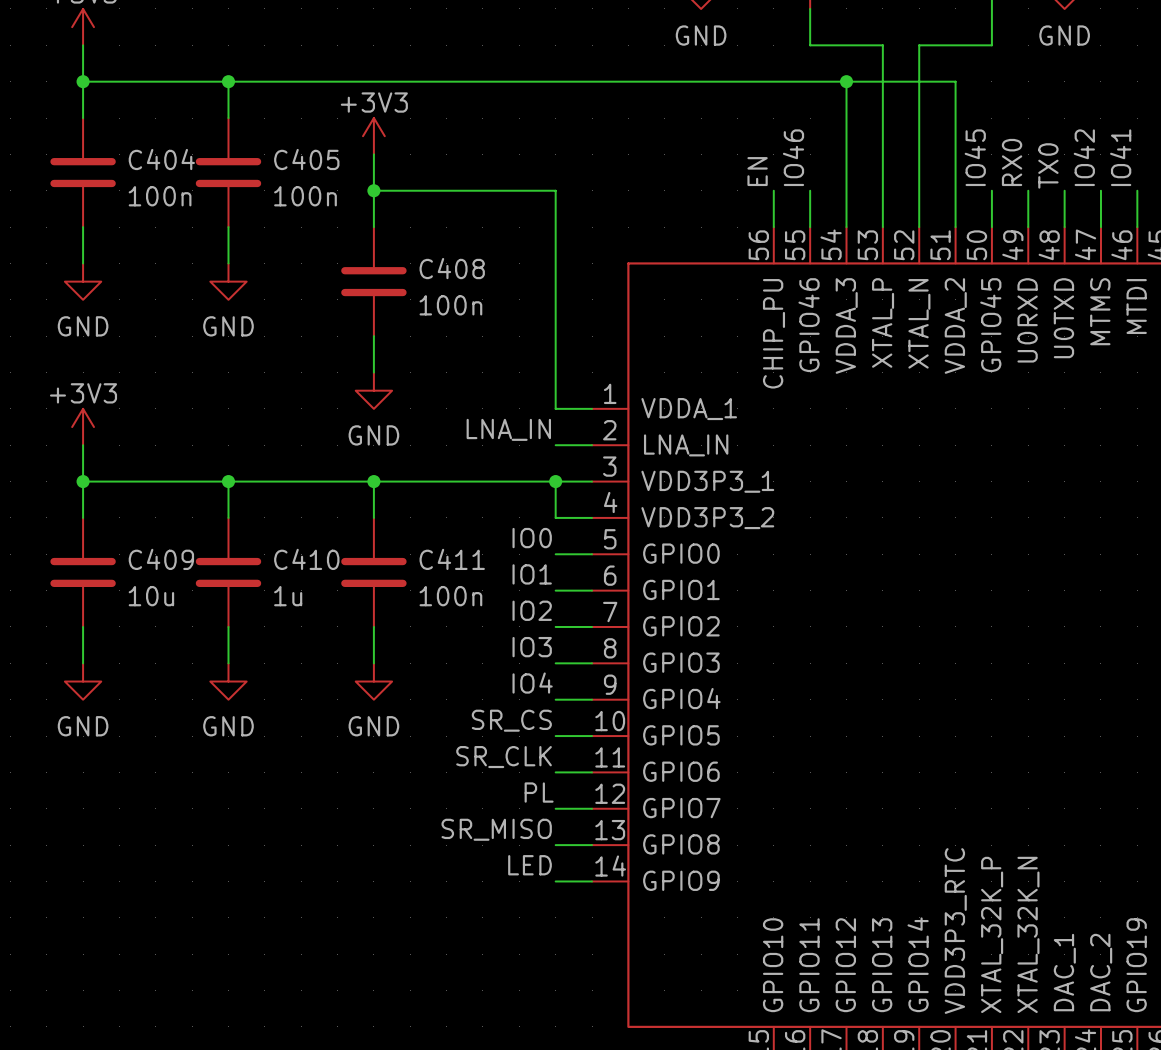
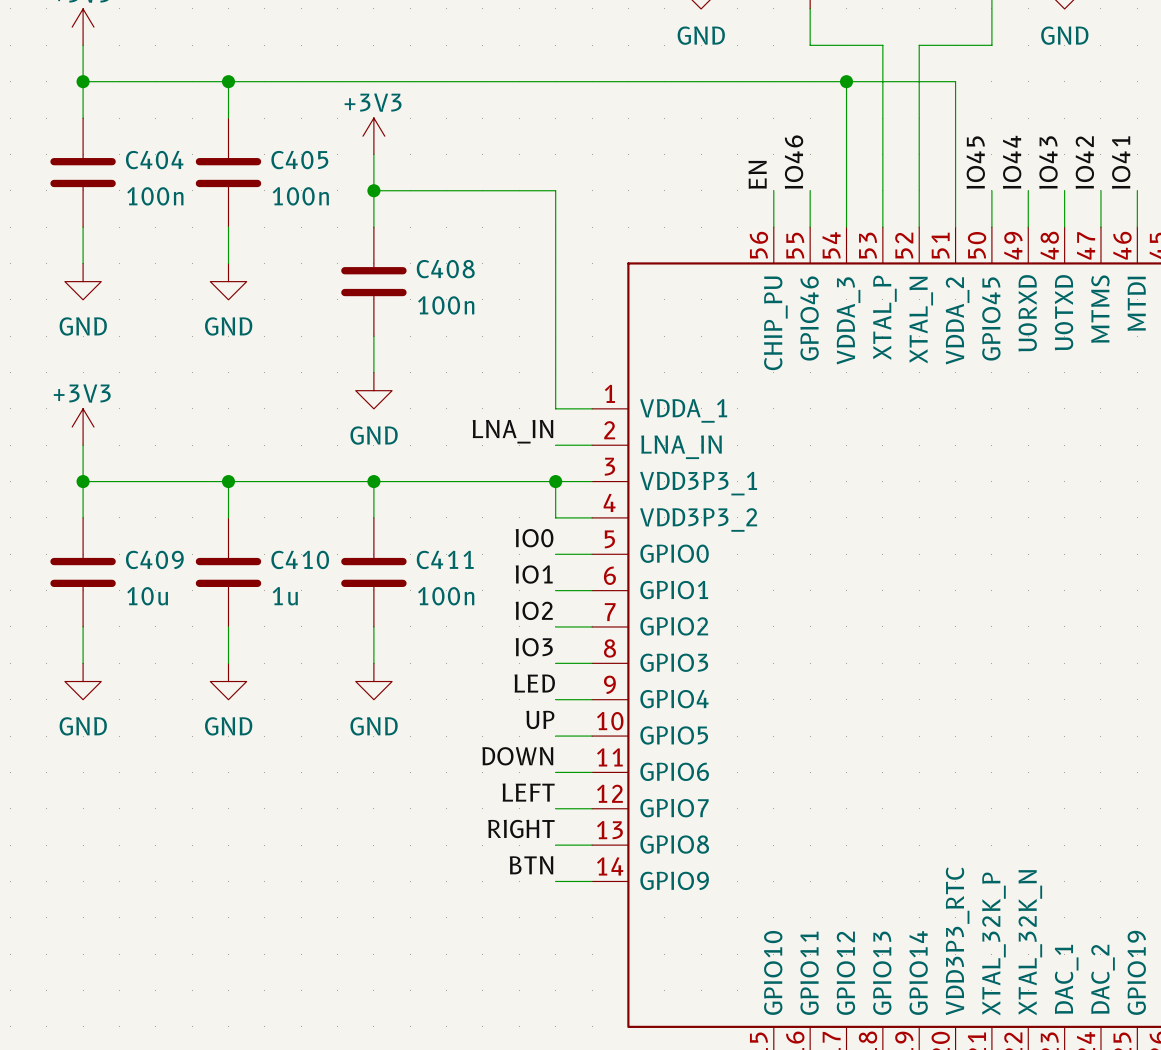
label: RX0 (1012, 162) -> IO44 (1012, 162)
label: TX0 (1048, 165) -> IO43 (1048, 162)
label: IO4 (532, 683) -> LED (534, 683)
label: SR_CS (511, 720) -> UP (540, 719)
label: SR_CLK (504, 757) -> DOWN (517, 756)
label: PL (539, 792) -> LEFT (528, 792)
label: SR_MISO (496, 829) -> RIGHT (521, 828)
label: LED (530, 865) -> BTN (531, 865)

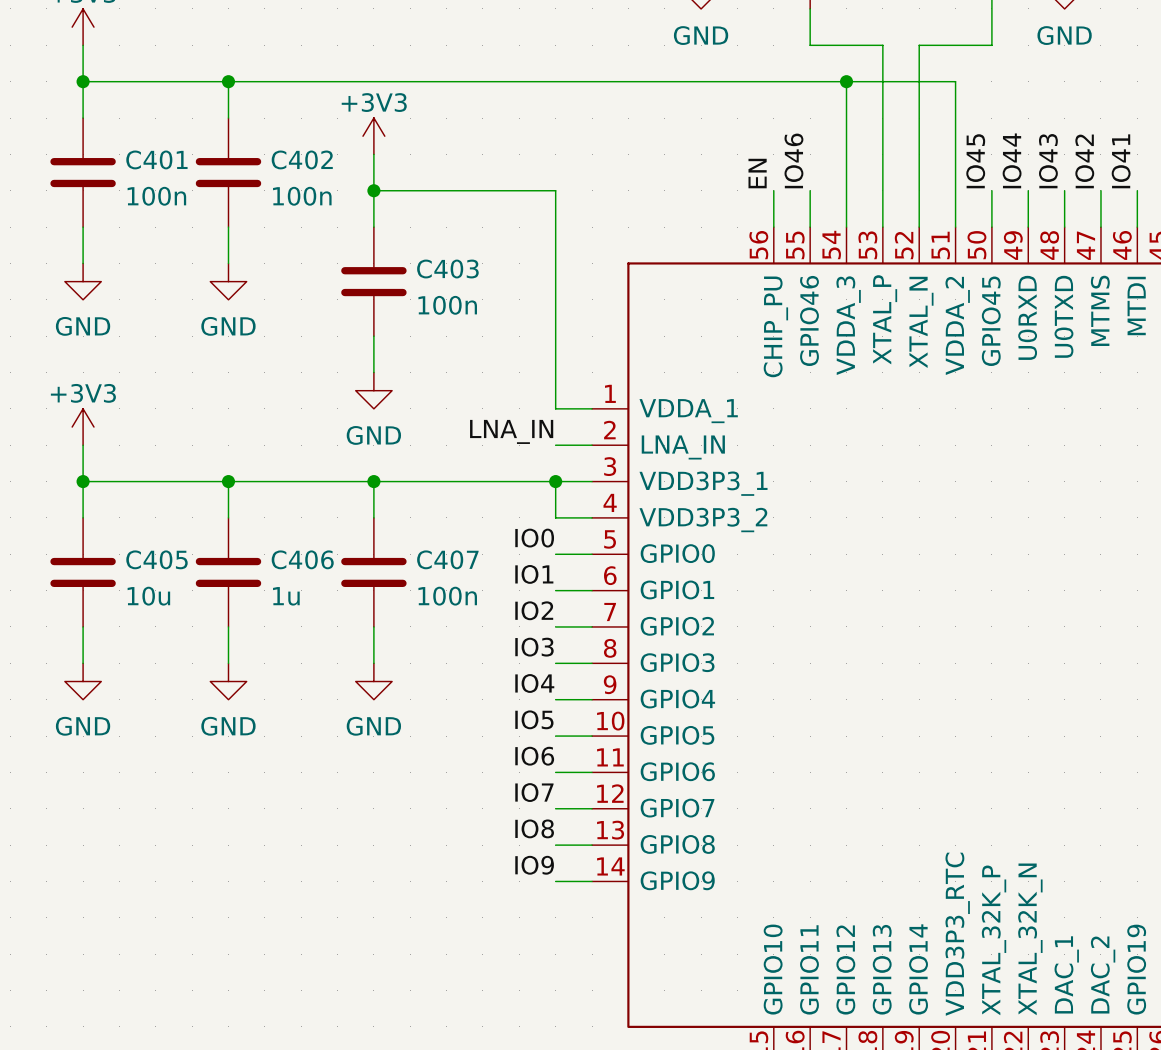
C404 name: C404 (154, 160) -> C401 (156, 159)
C405 name: C405 (299, 160) -> C402 (302, 159)
C408 name: C408 (445, 269) -> C403 (447, 269)
C409 name: C409 (154, 559) -> C405 (156, 559)
C410 name: C410 (300, 559) -> C406 (302, 559)
C411 name: C411 (445, 559) -> C407 (447, 559)
label: LED (534, 683) -> IO4 (534, 683)
label: UP (540, 719) -> IO5 (534, 719)
label: DOWN (517, 756) -> IO6 (534, 756)
label: LEFT (528, 792) -> IO7 (534, 792)
label: RIGHT (521, 828) -> IO8 (534, 828)
label: BTN (531, 865) -> IO9 (534, 865)

